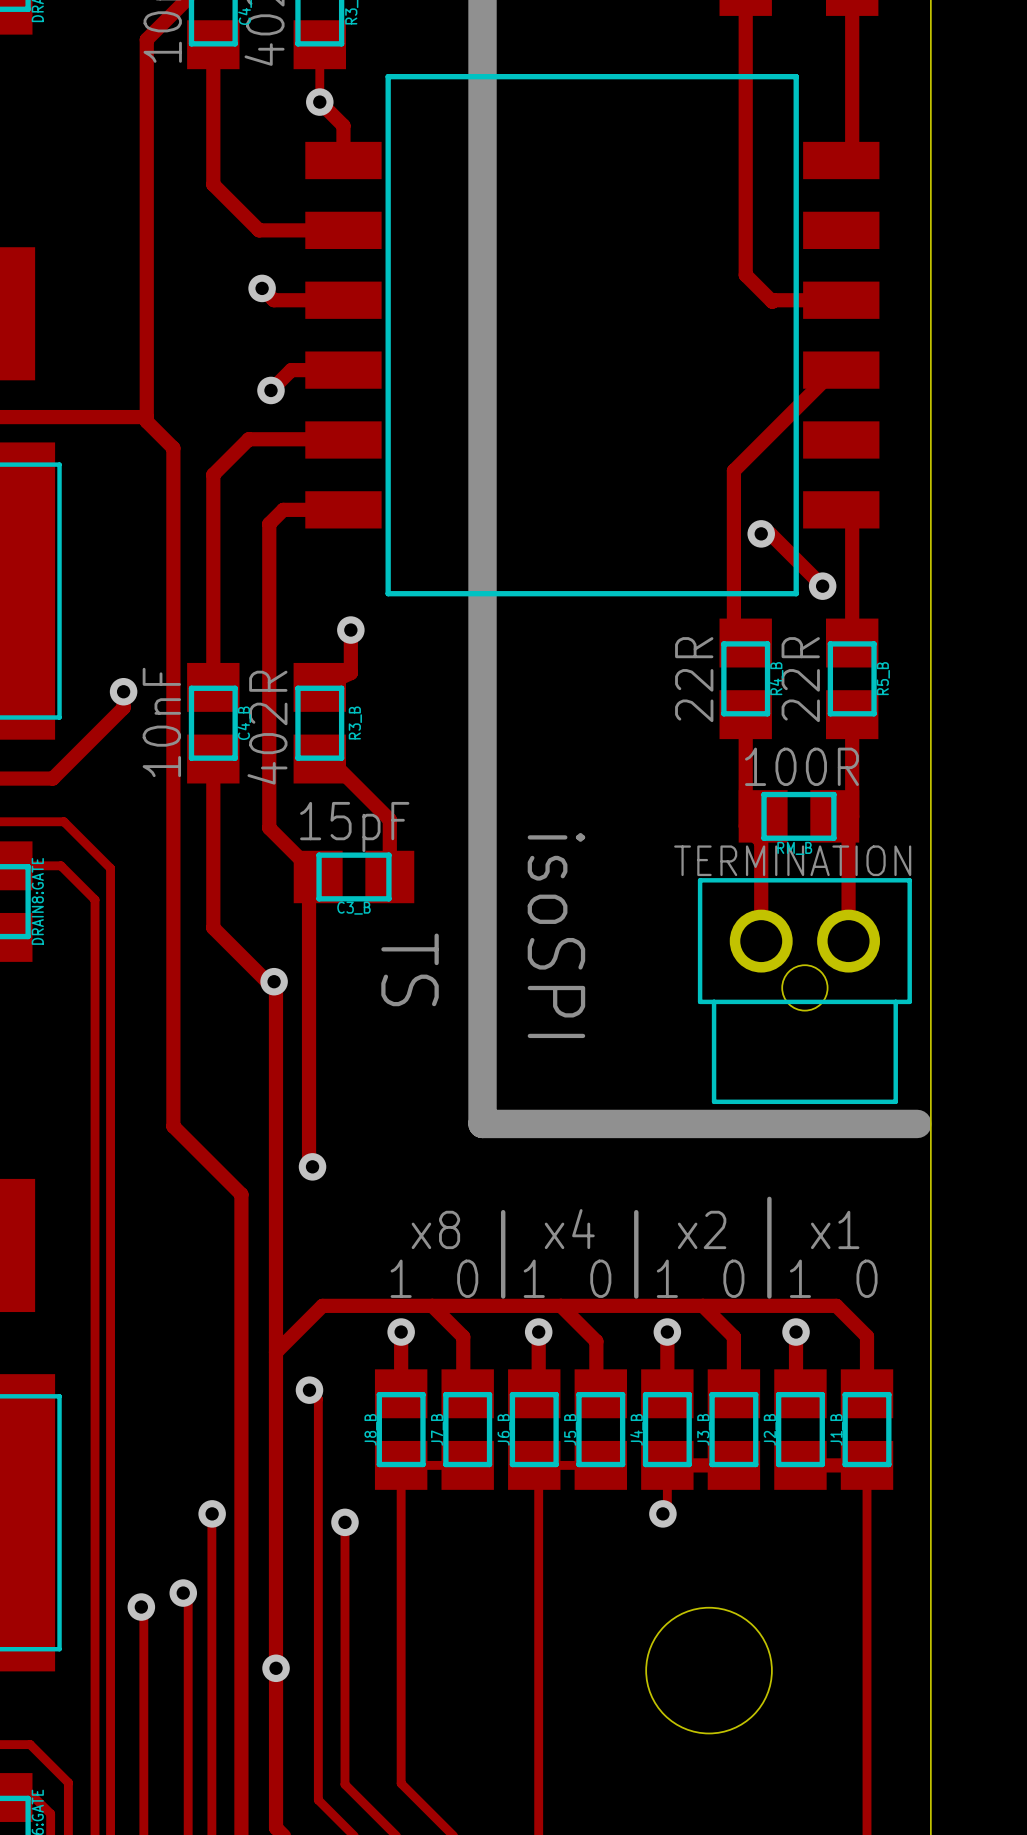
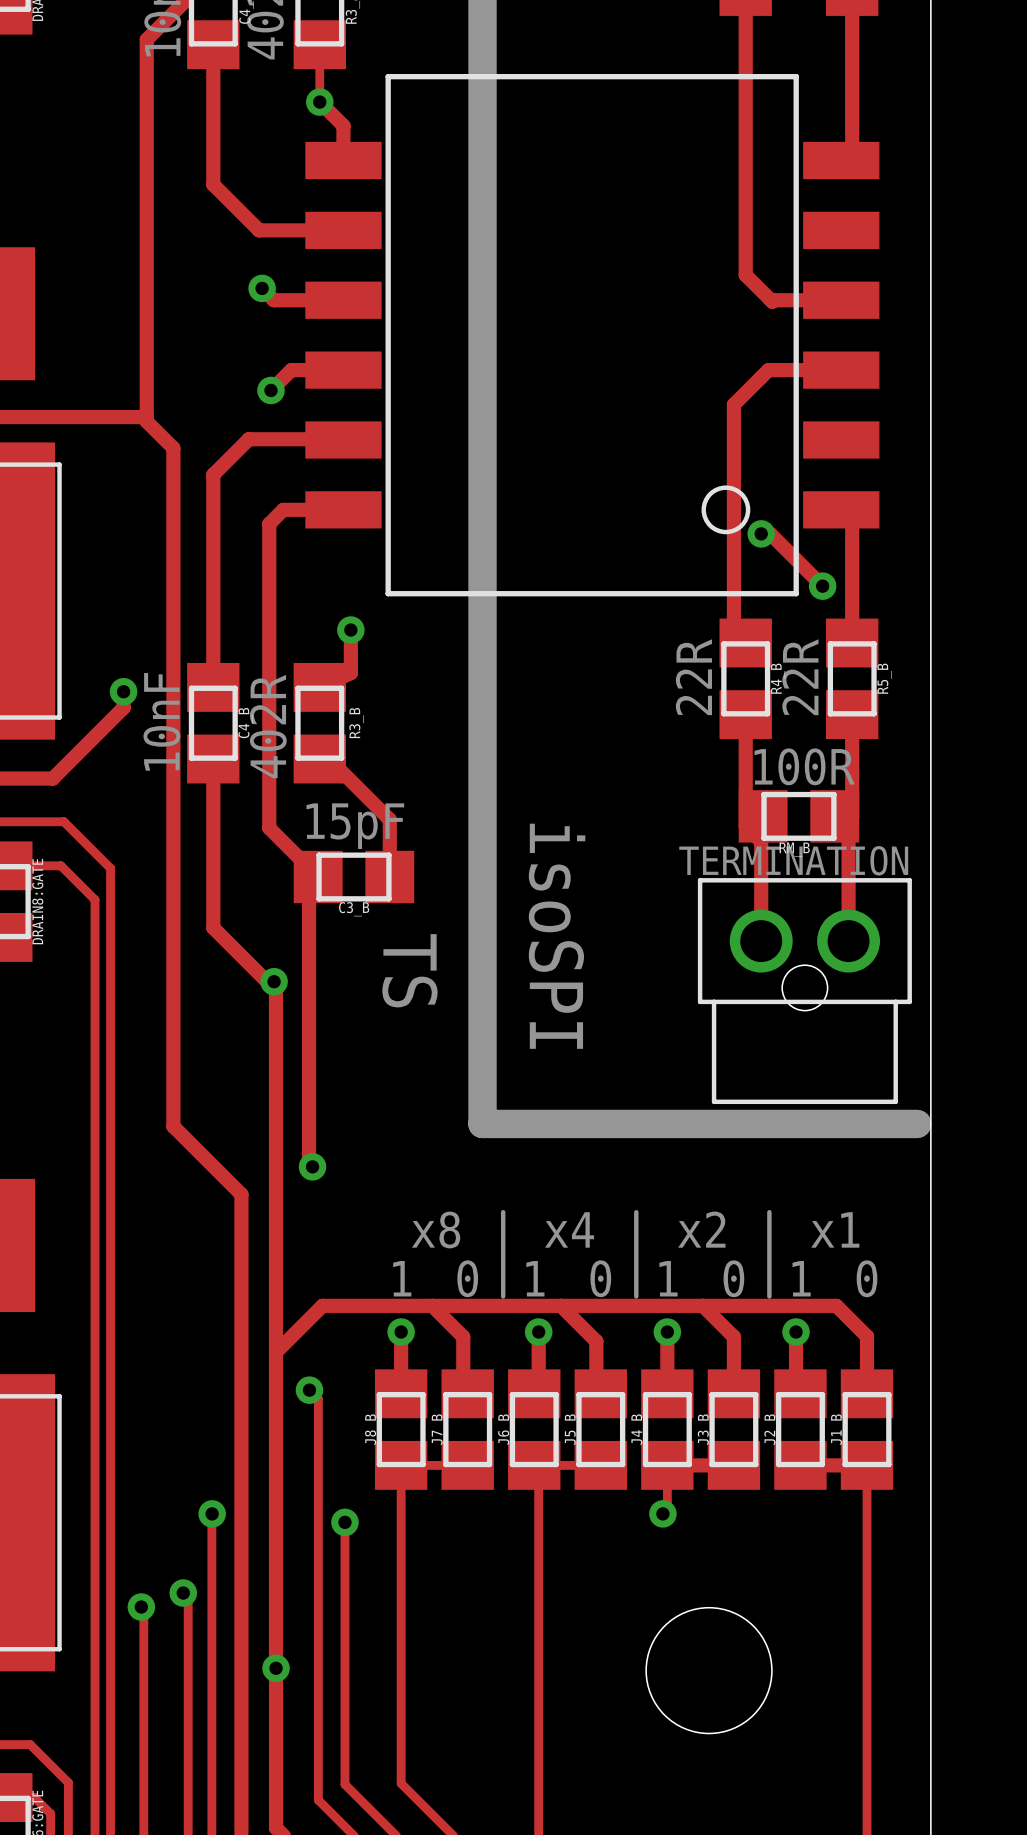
part footprint: [305, 74, 880, 597] -> [305, 74, 880, 597]
track: (834, 370) (733, 470) -> (834, 370) (768, 370) (733, 404) (733, 470)
line: (769, 1198) (769, 1212) -> none

